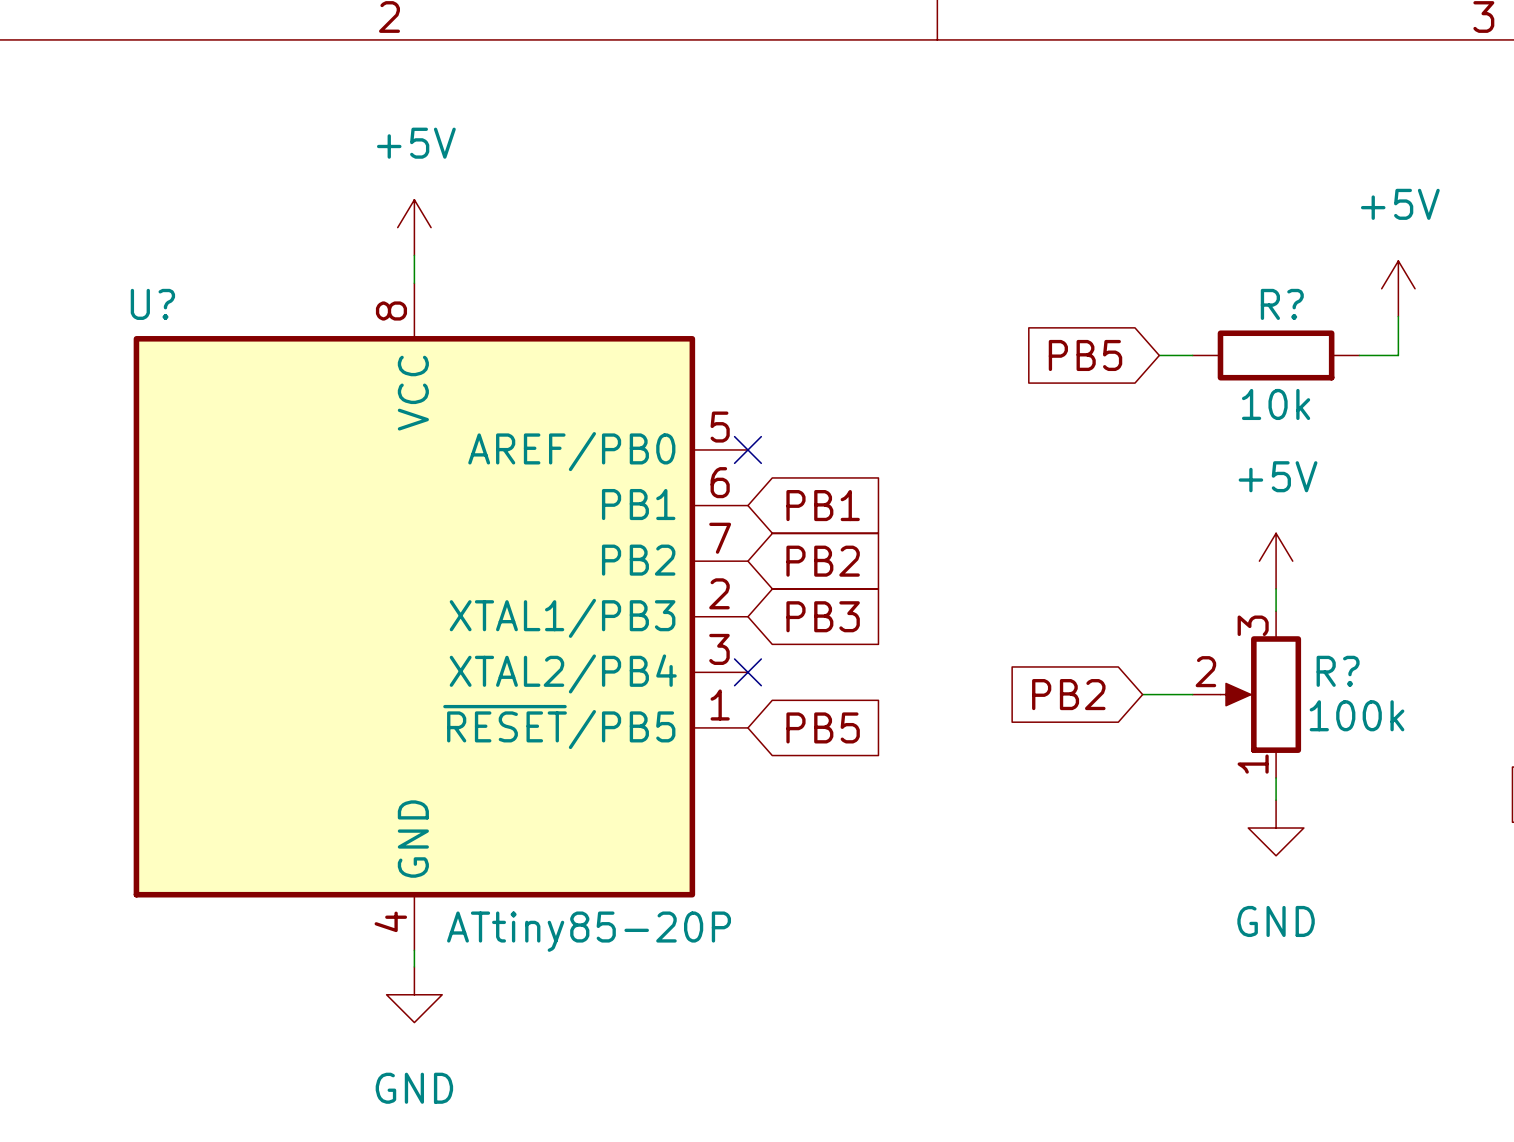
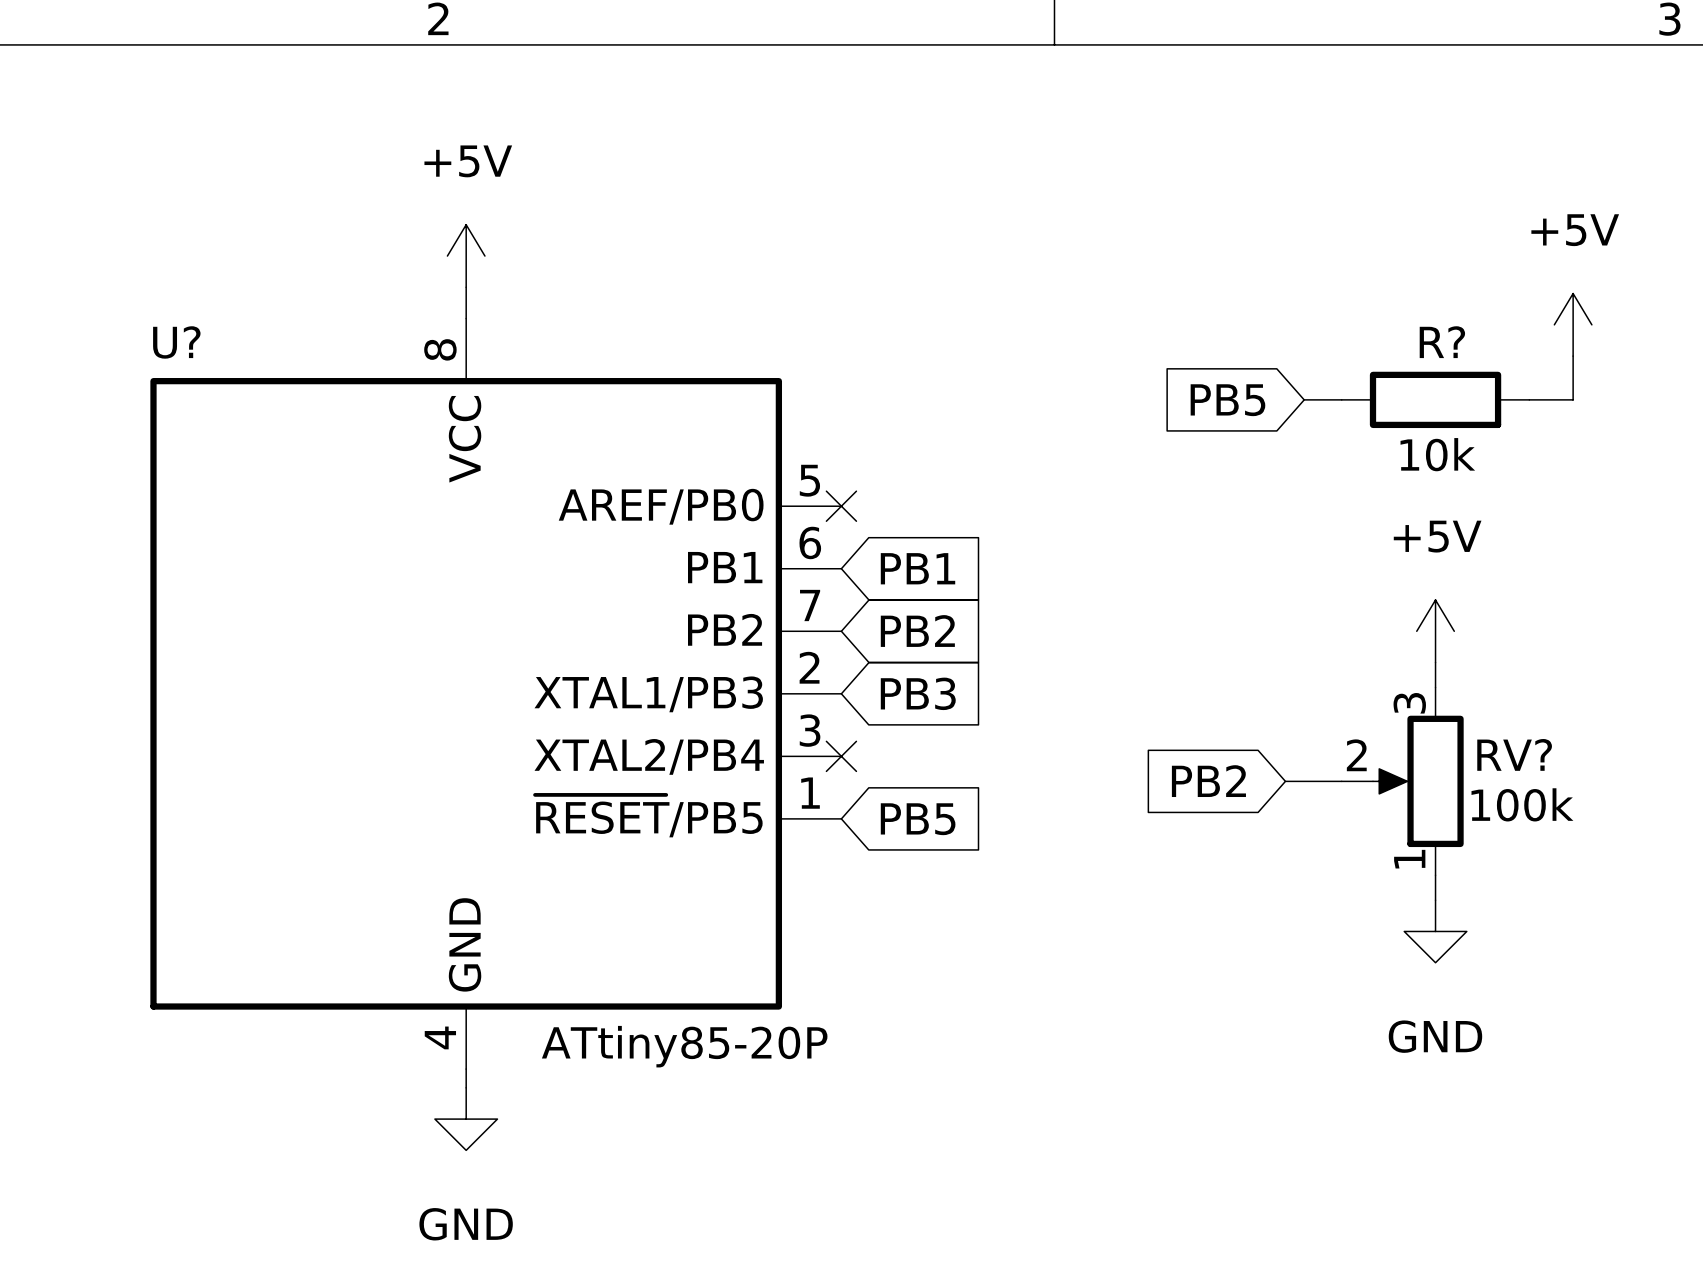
R? name: R? (1338, 671) -> RV? (1514, 754)

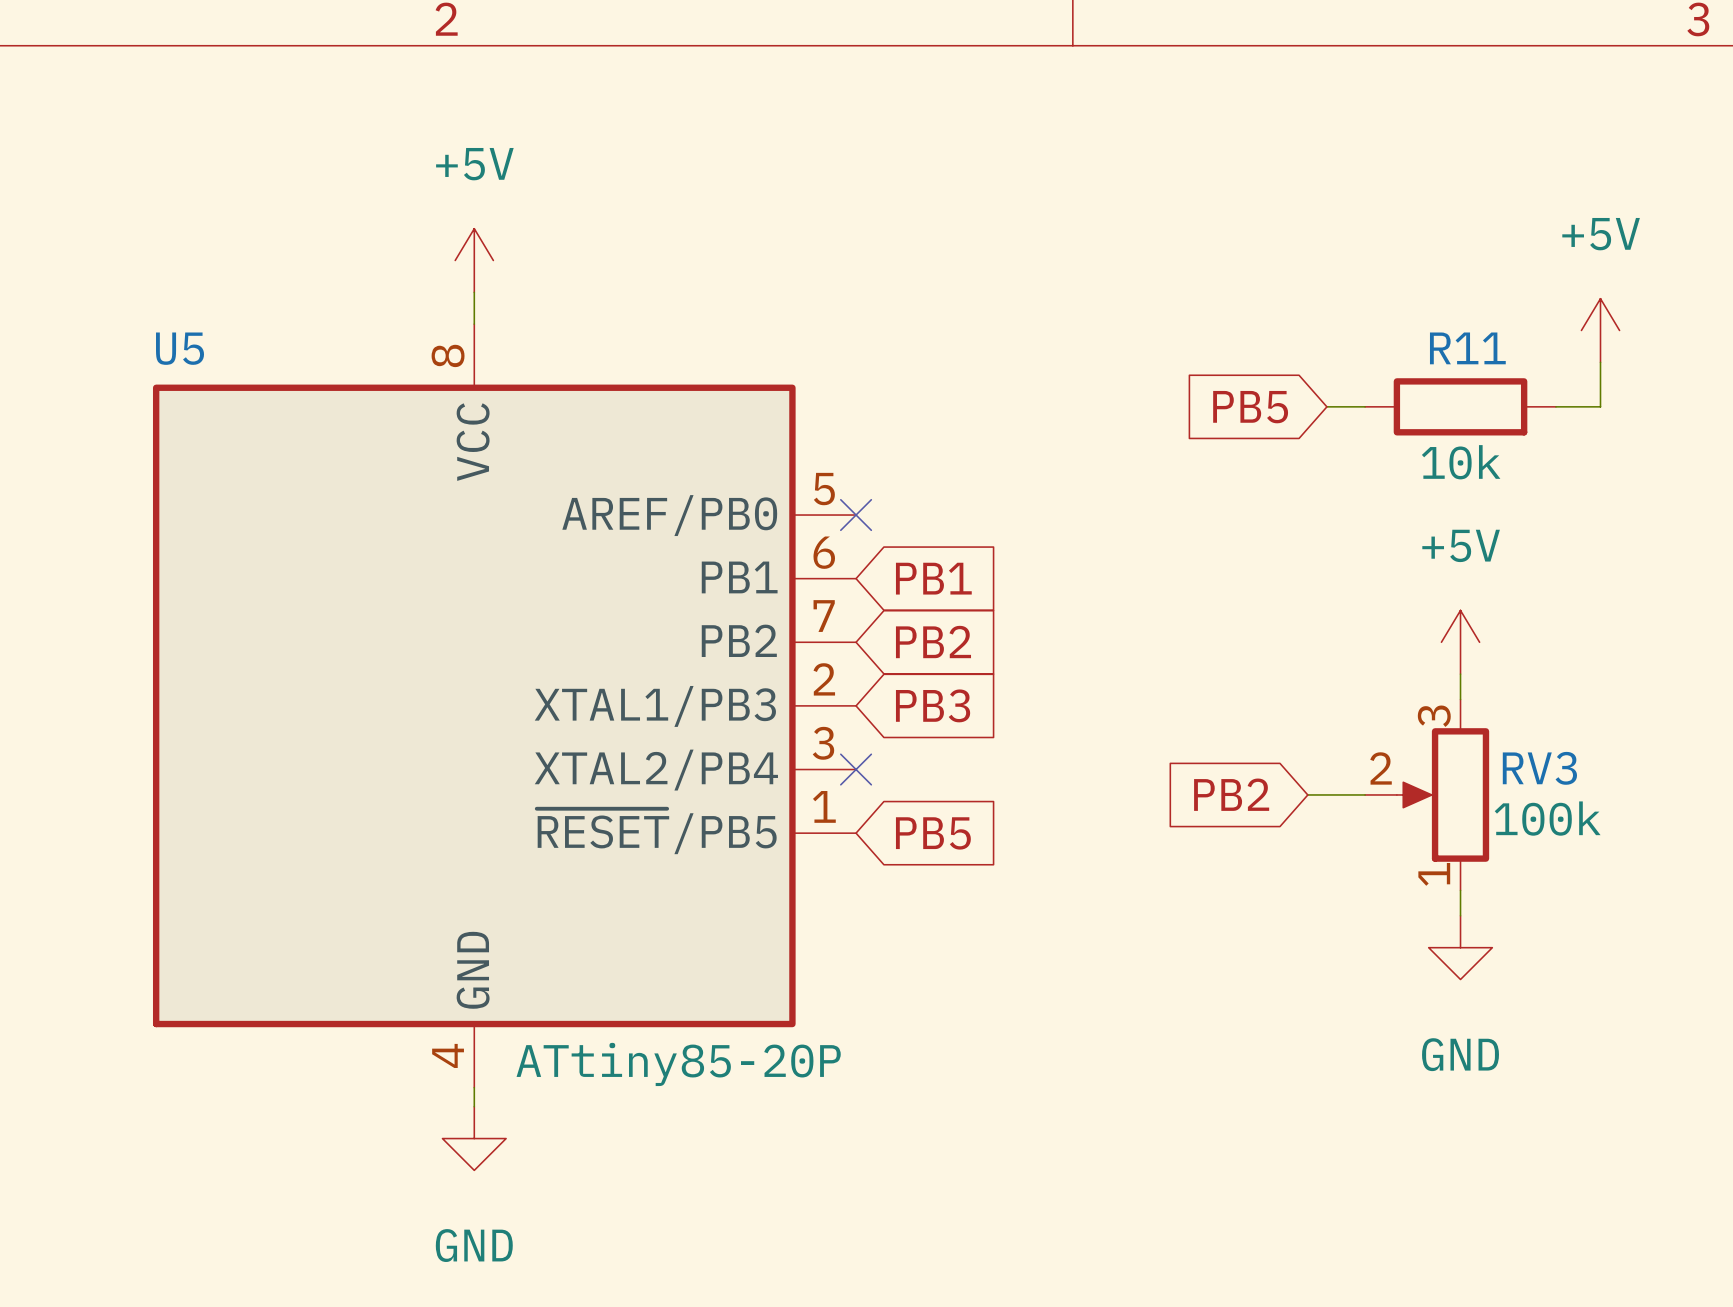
U? name: U? (176, 342) -> U5 (180, 348)
R? name: R? (1442, 342) -> R11 (1467, 348)
RV? name: RV? (1514, 754) -> RV3 (1539, 768)

